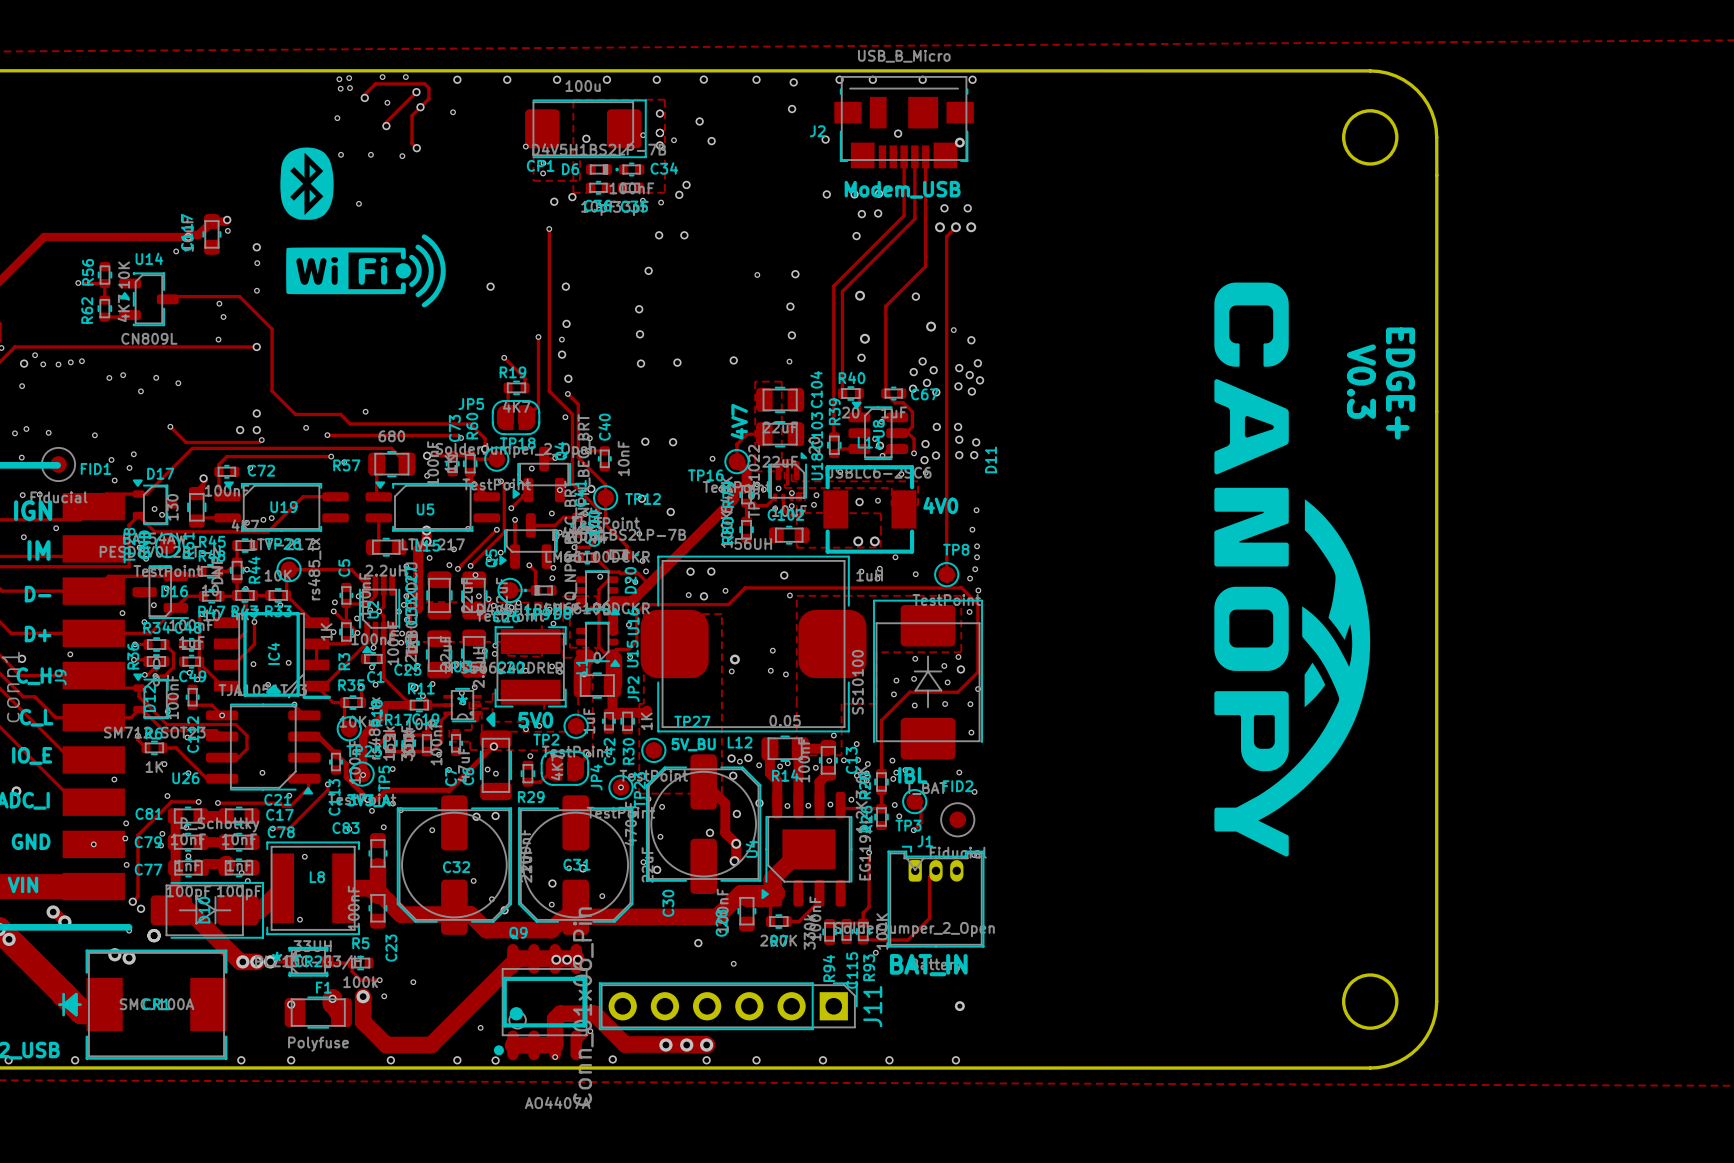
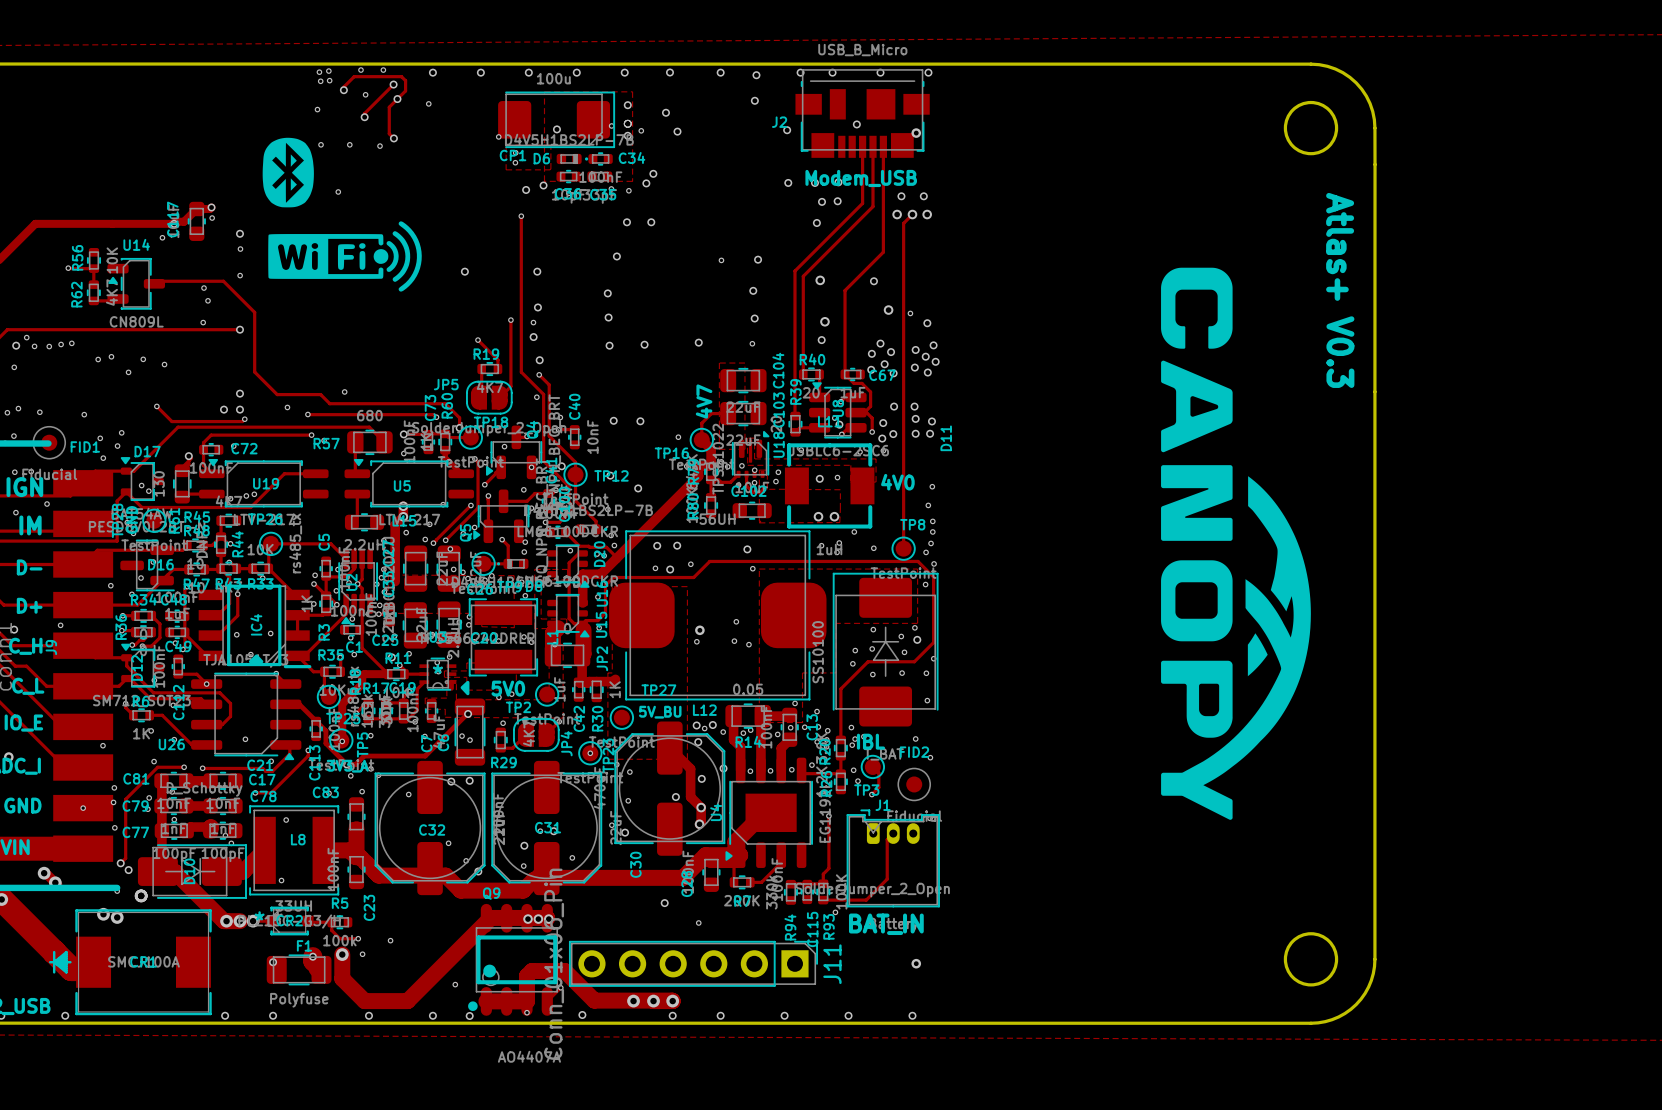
text: none -> Atlas+ (1340, 246)
text: V0.3 (1361, 381) -> none
text: EDGE+ (1400, 383) -> V0.3 (1340, 352)

